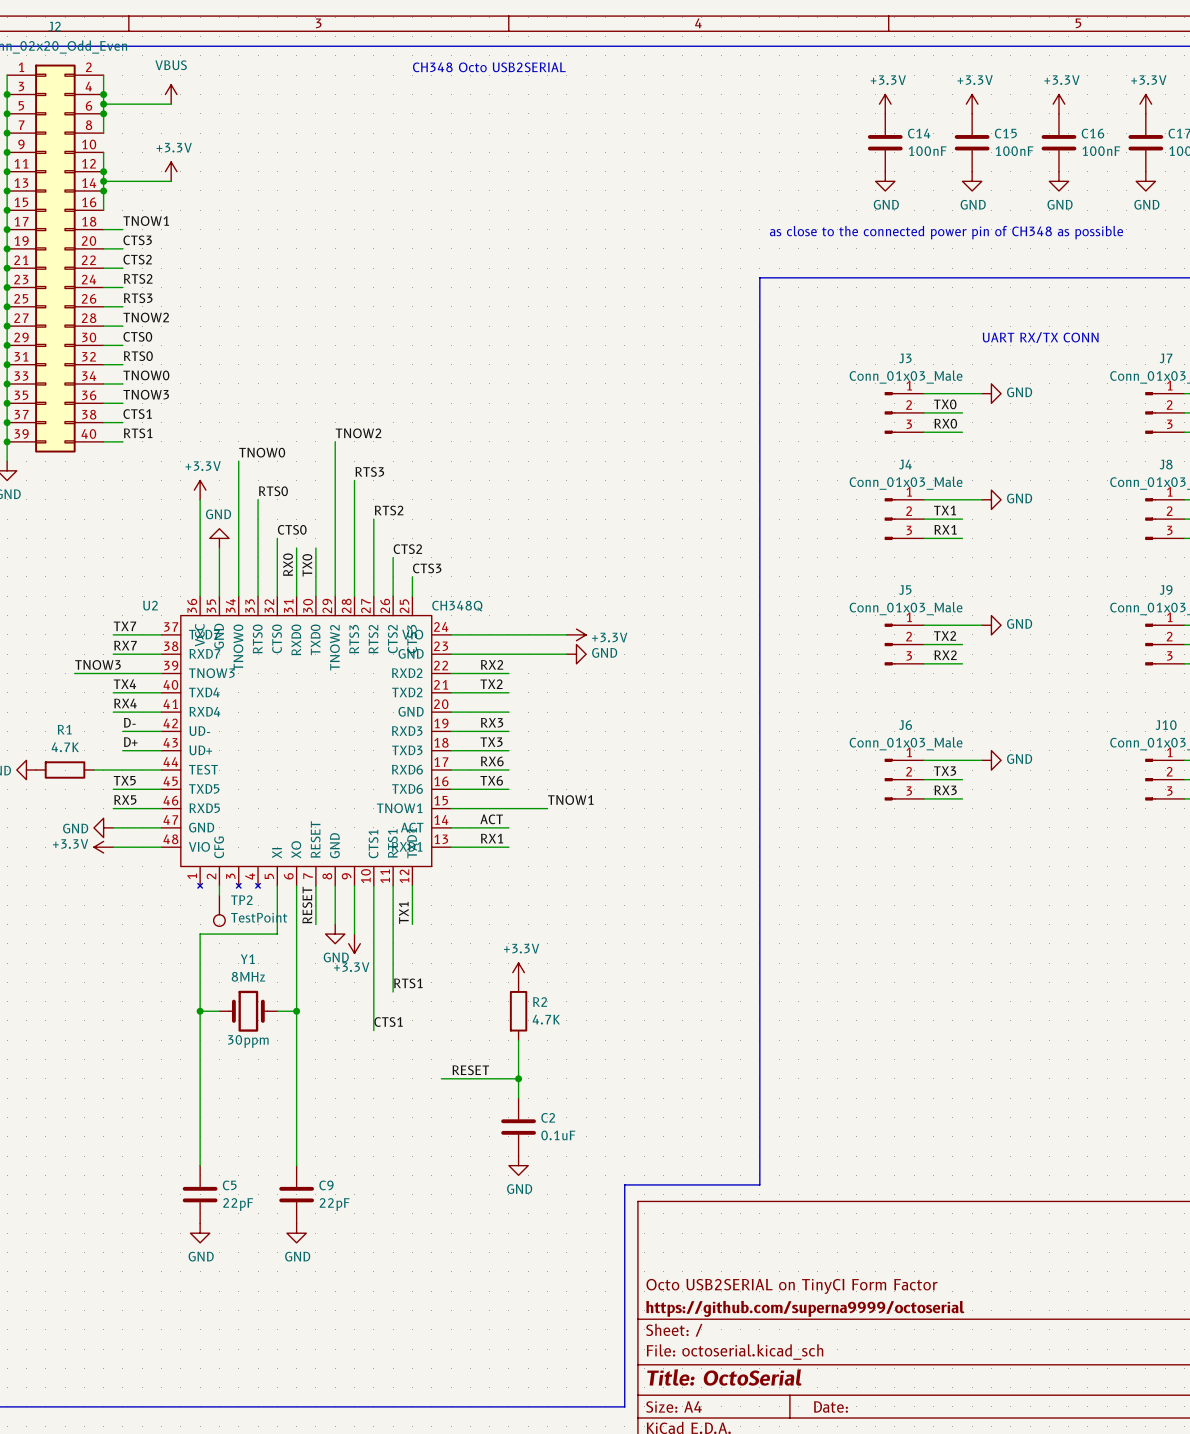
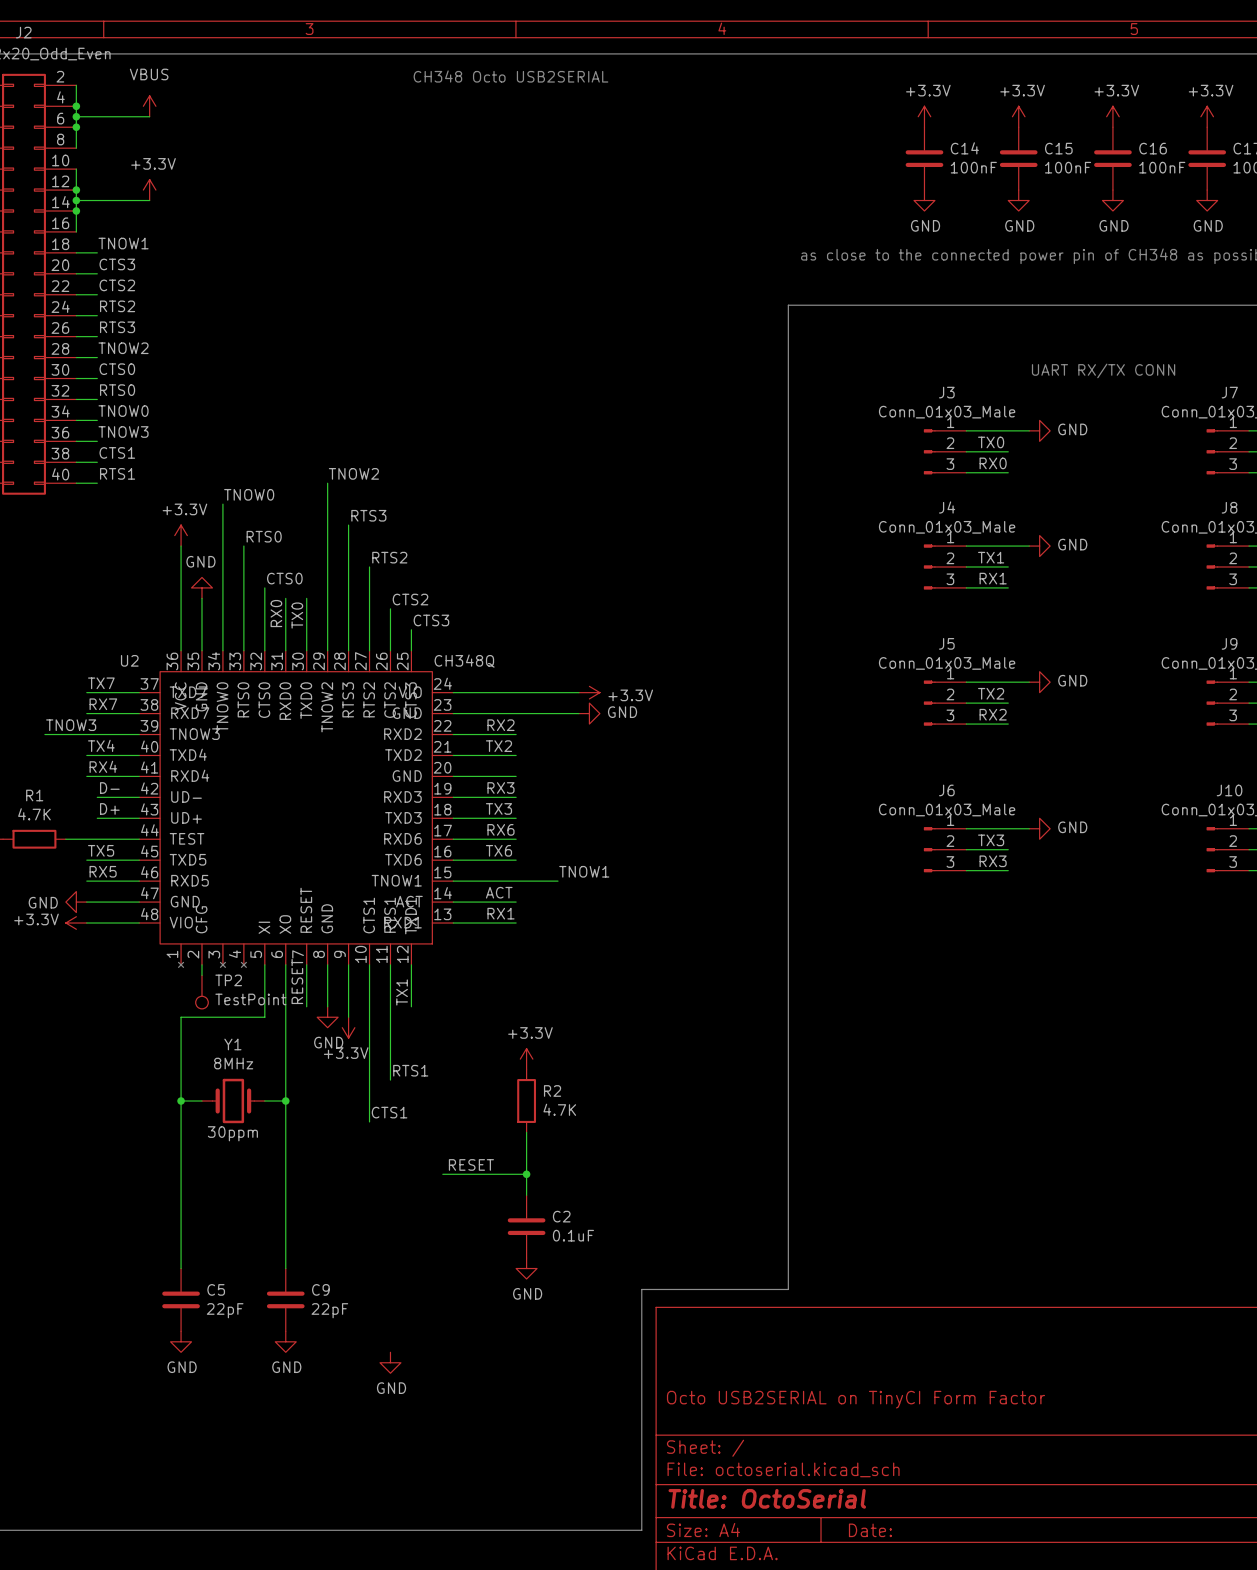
power symbol: none -> GND (390, 1362)
title block: https://github.com/superna9999/octoserial (805, 1308) -> none

